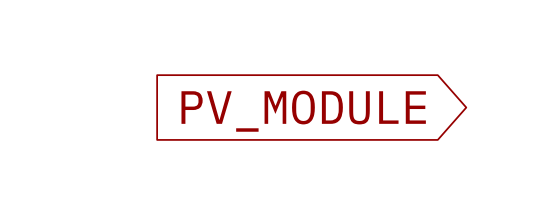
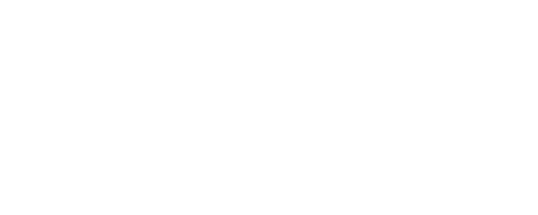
global label: PV_MODULE (303, 111) -> none

